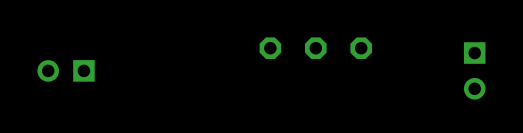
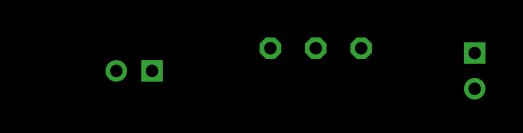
part position: (66, 70) -> (134, 70)

